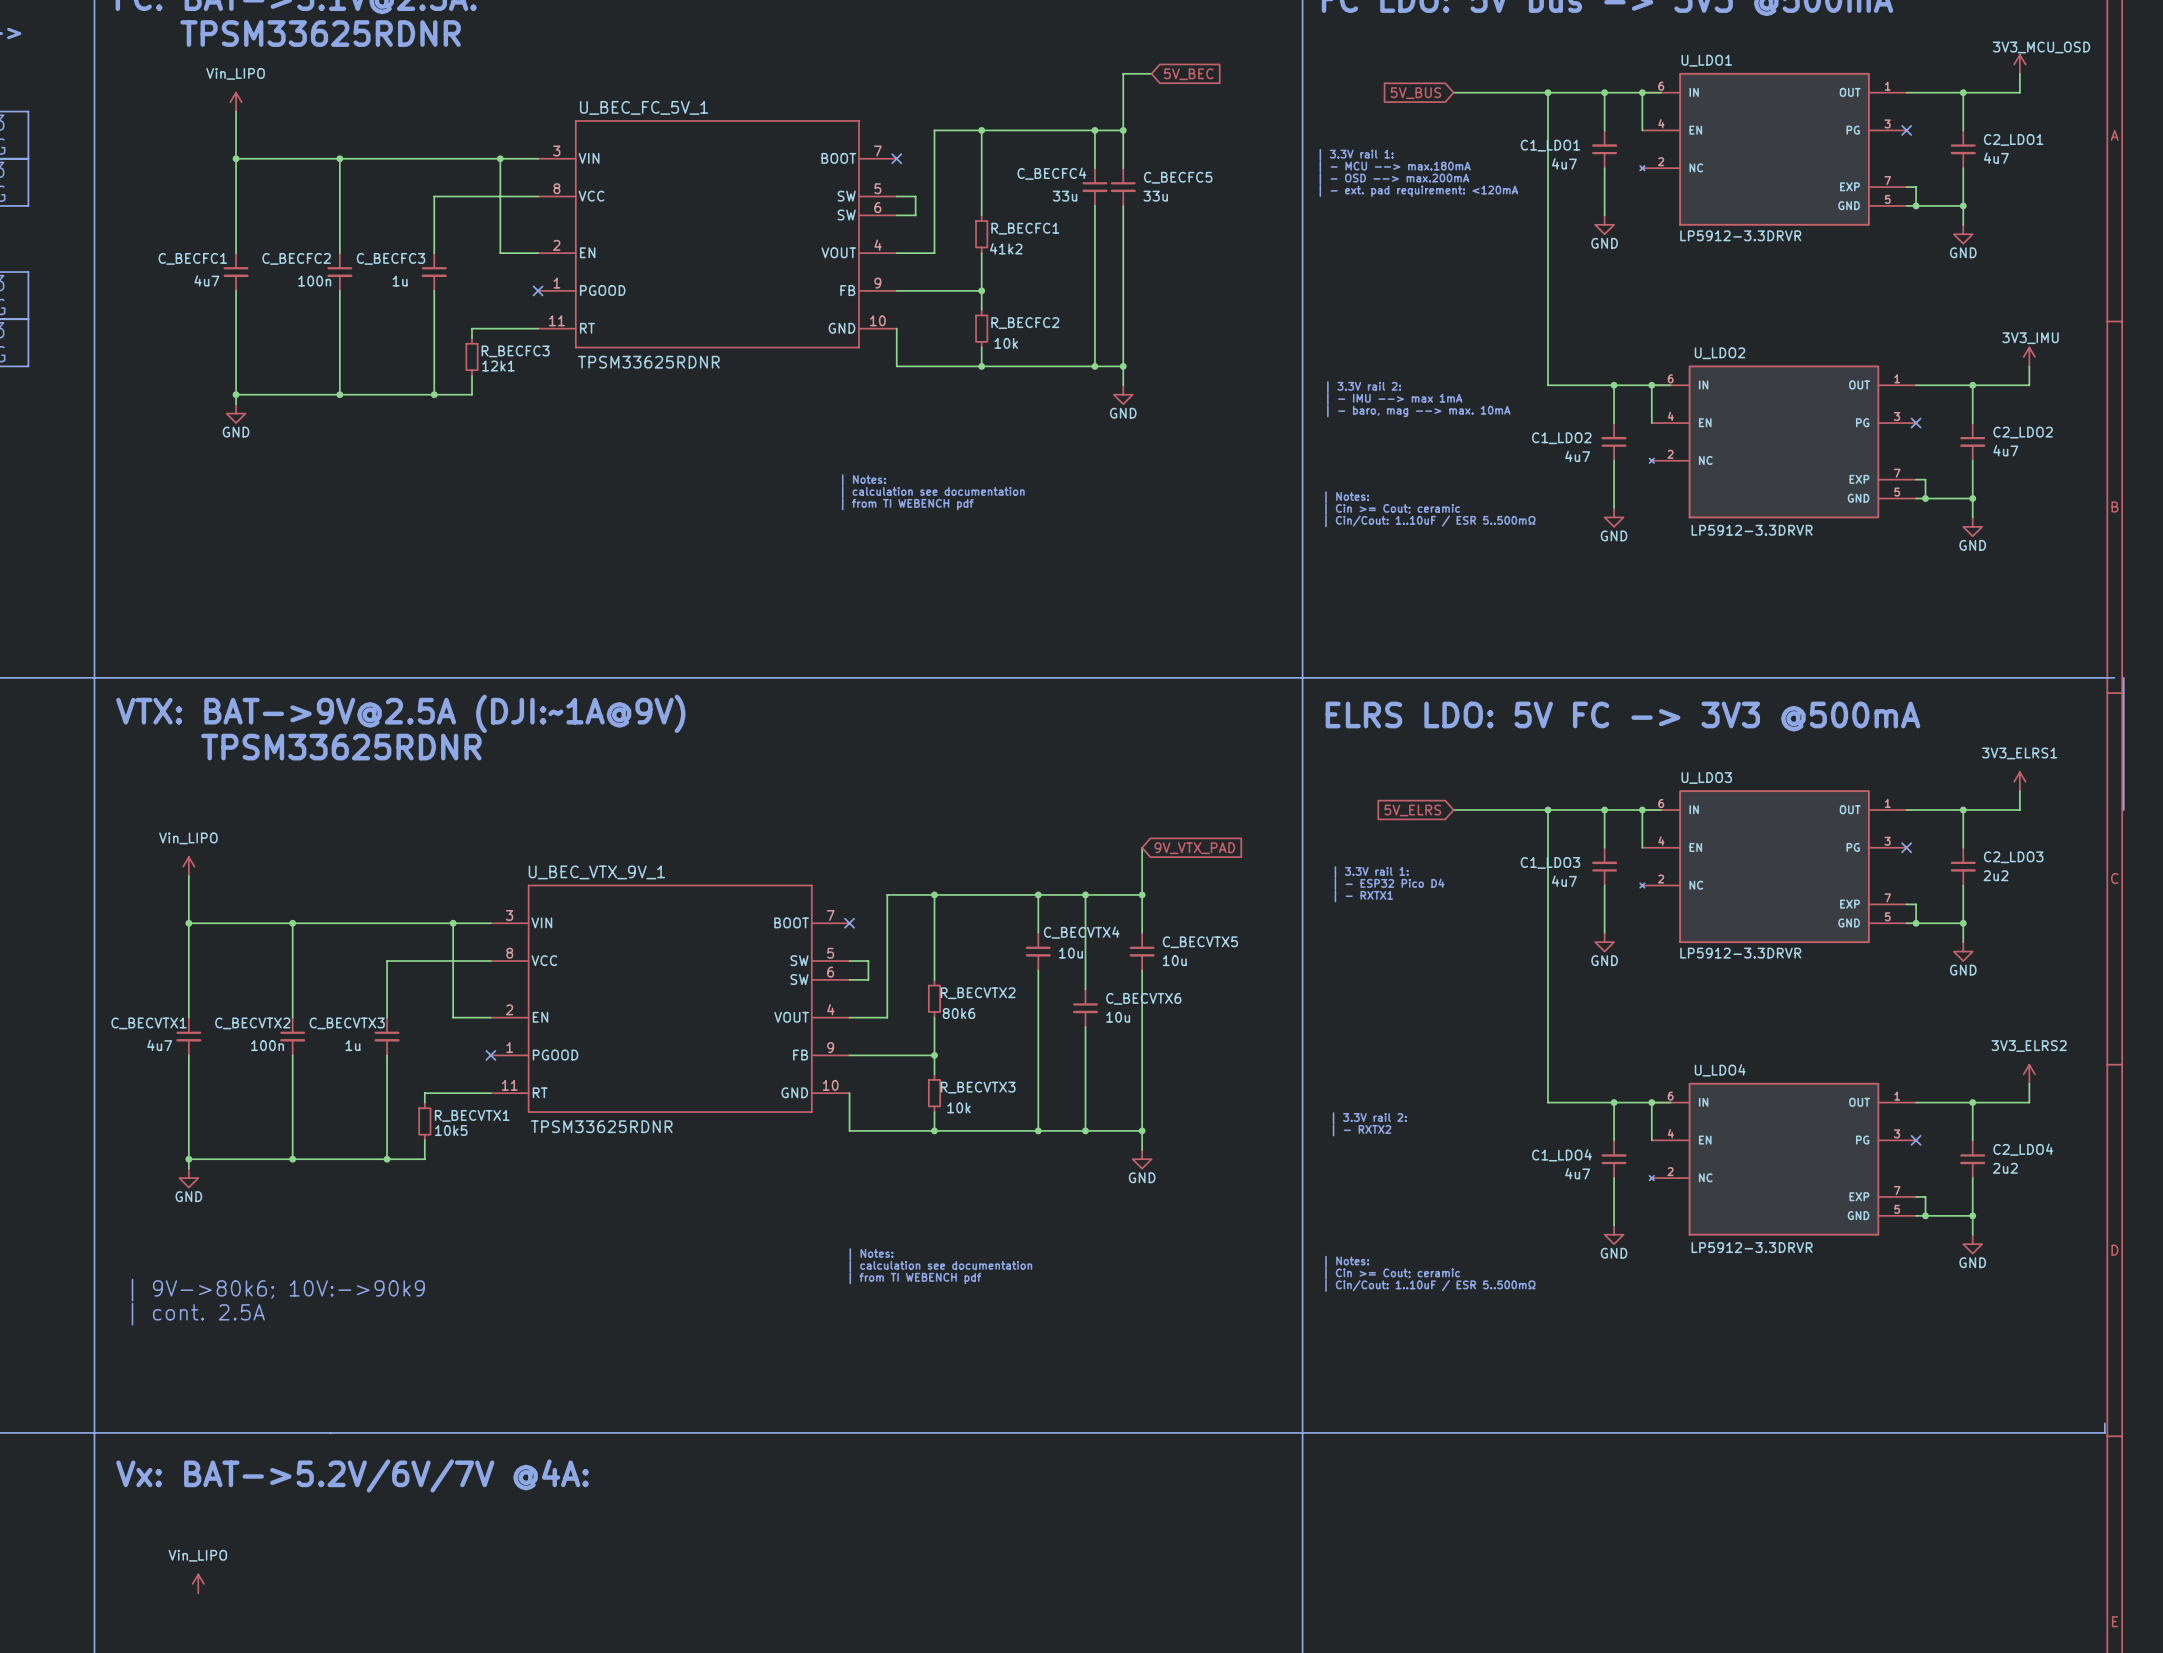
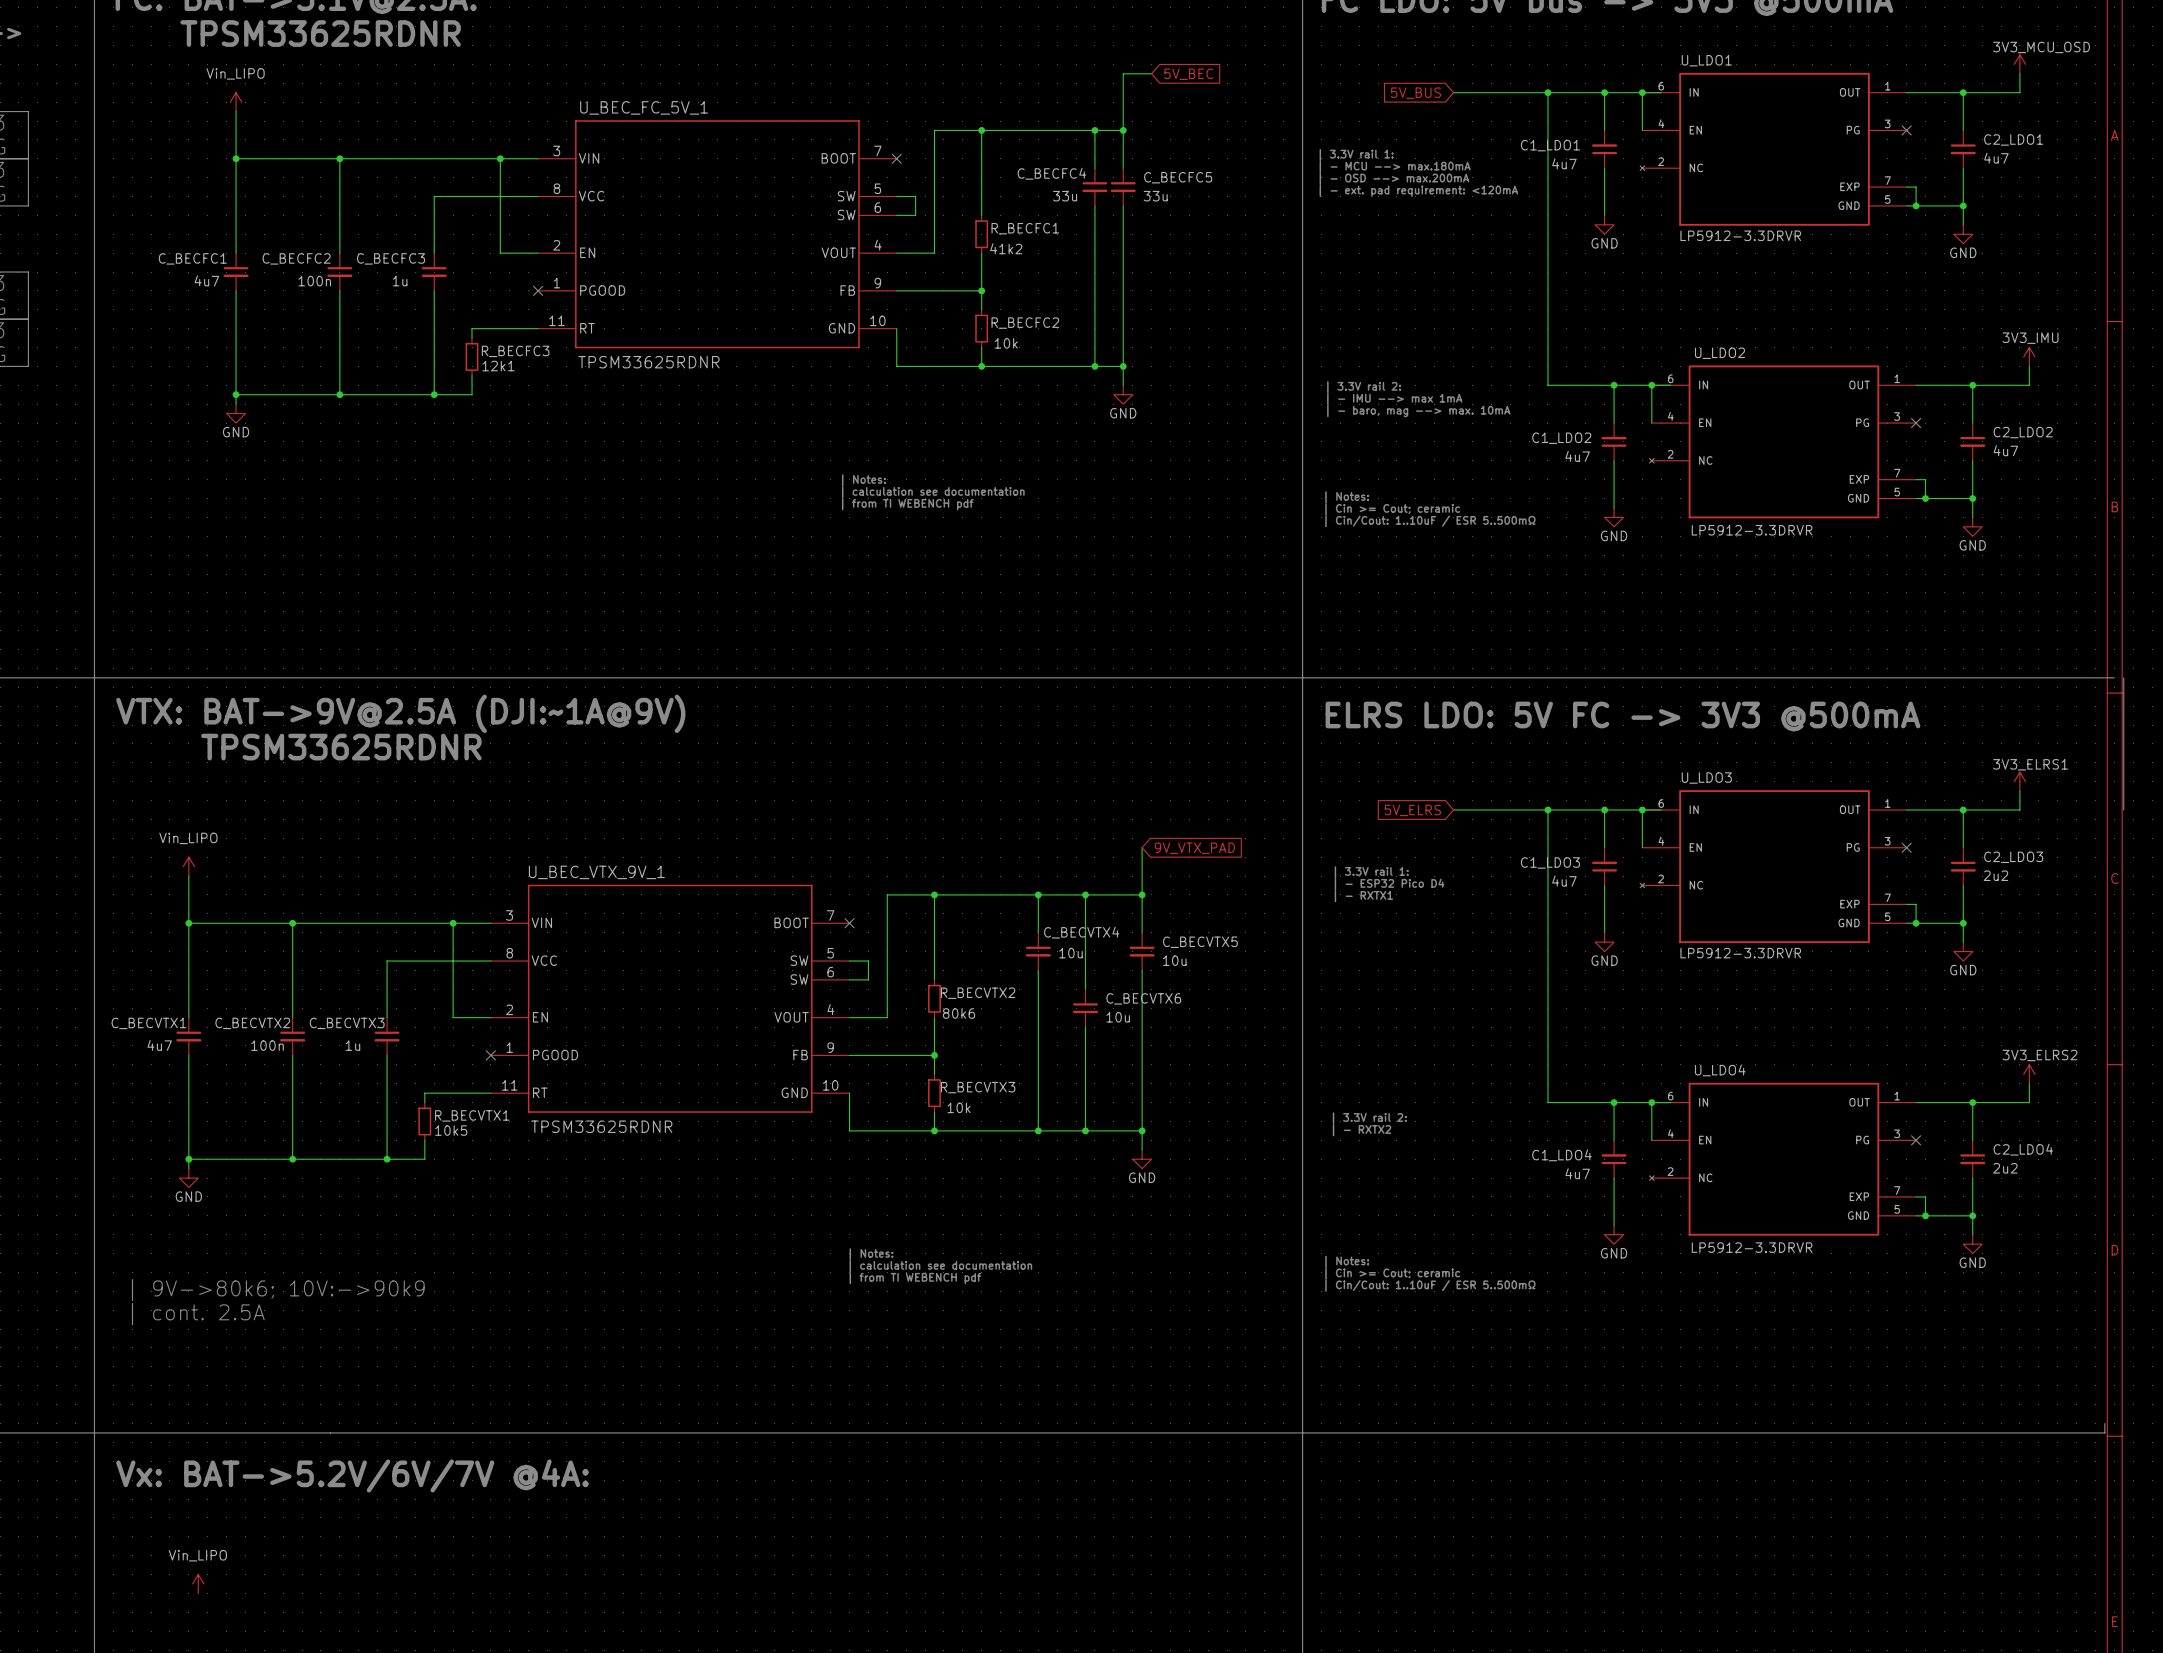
power symbol text position: 3V3_ELRS1 (2019, 753) -> 3V3_ELRS1 (2030, 764)
power symbol text position: 3V3_ELRS2 (2029, 1046) -> 3V3_ELRS2 (2039, 1055)

